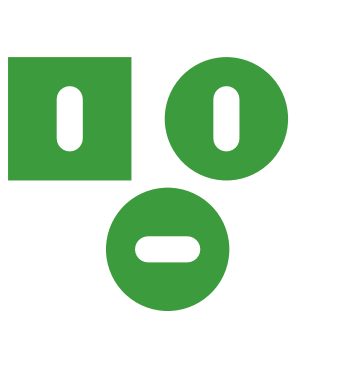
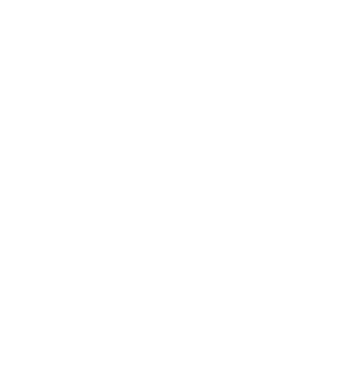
part: (148, 184) -> none

